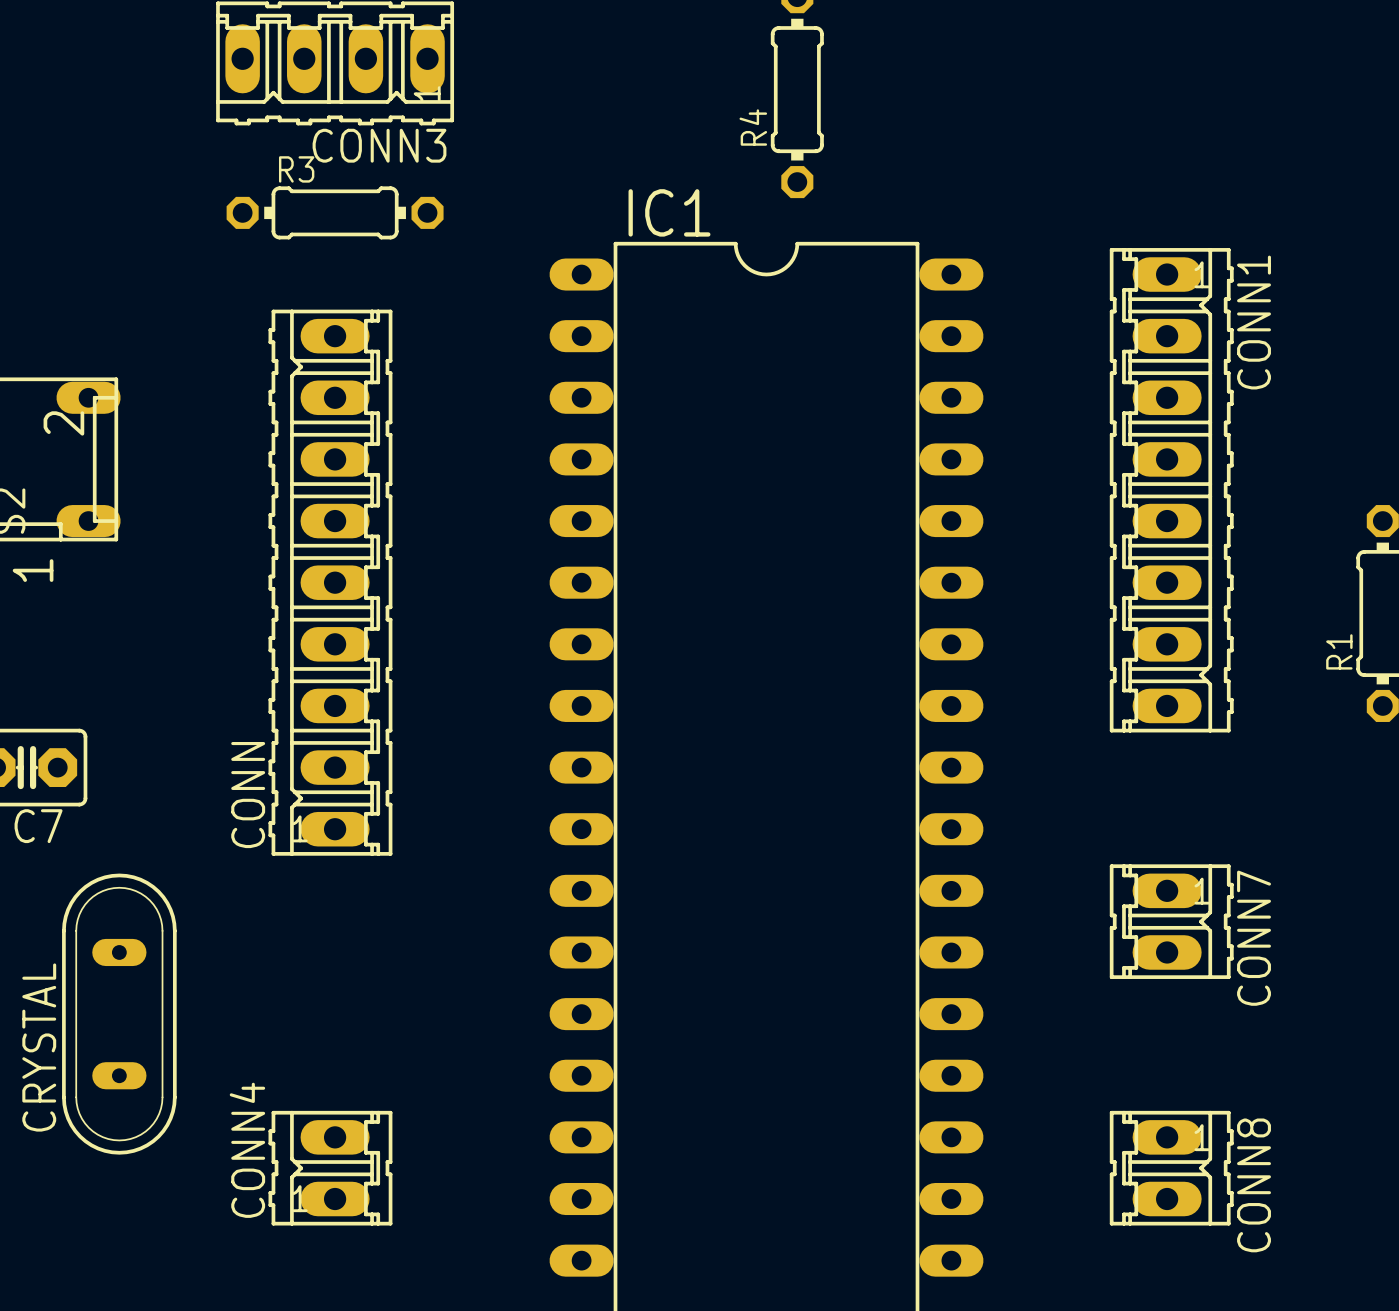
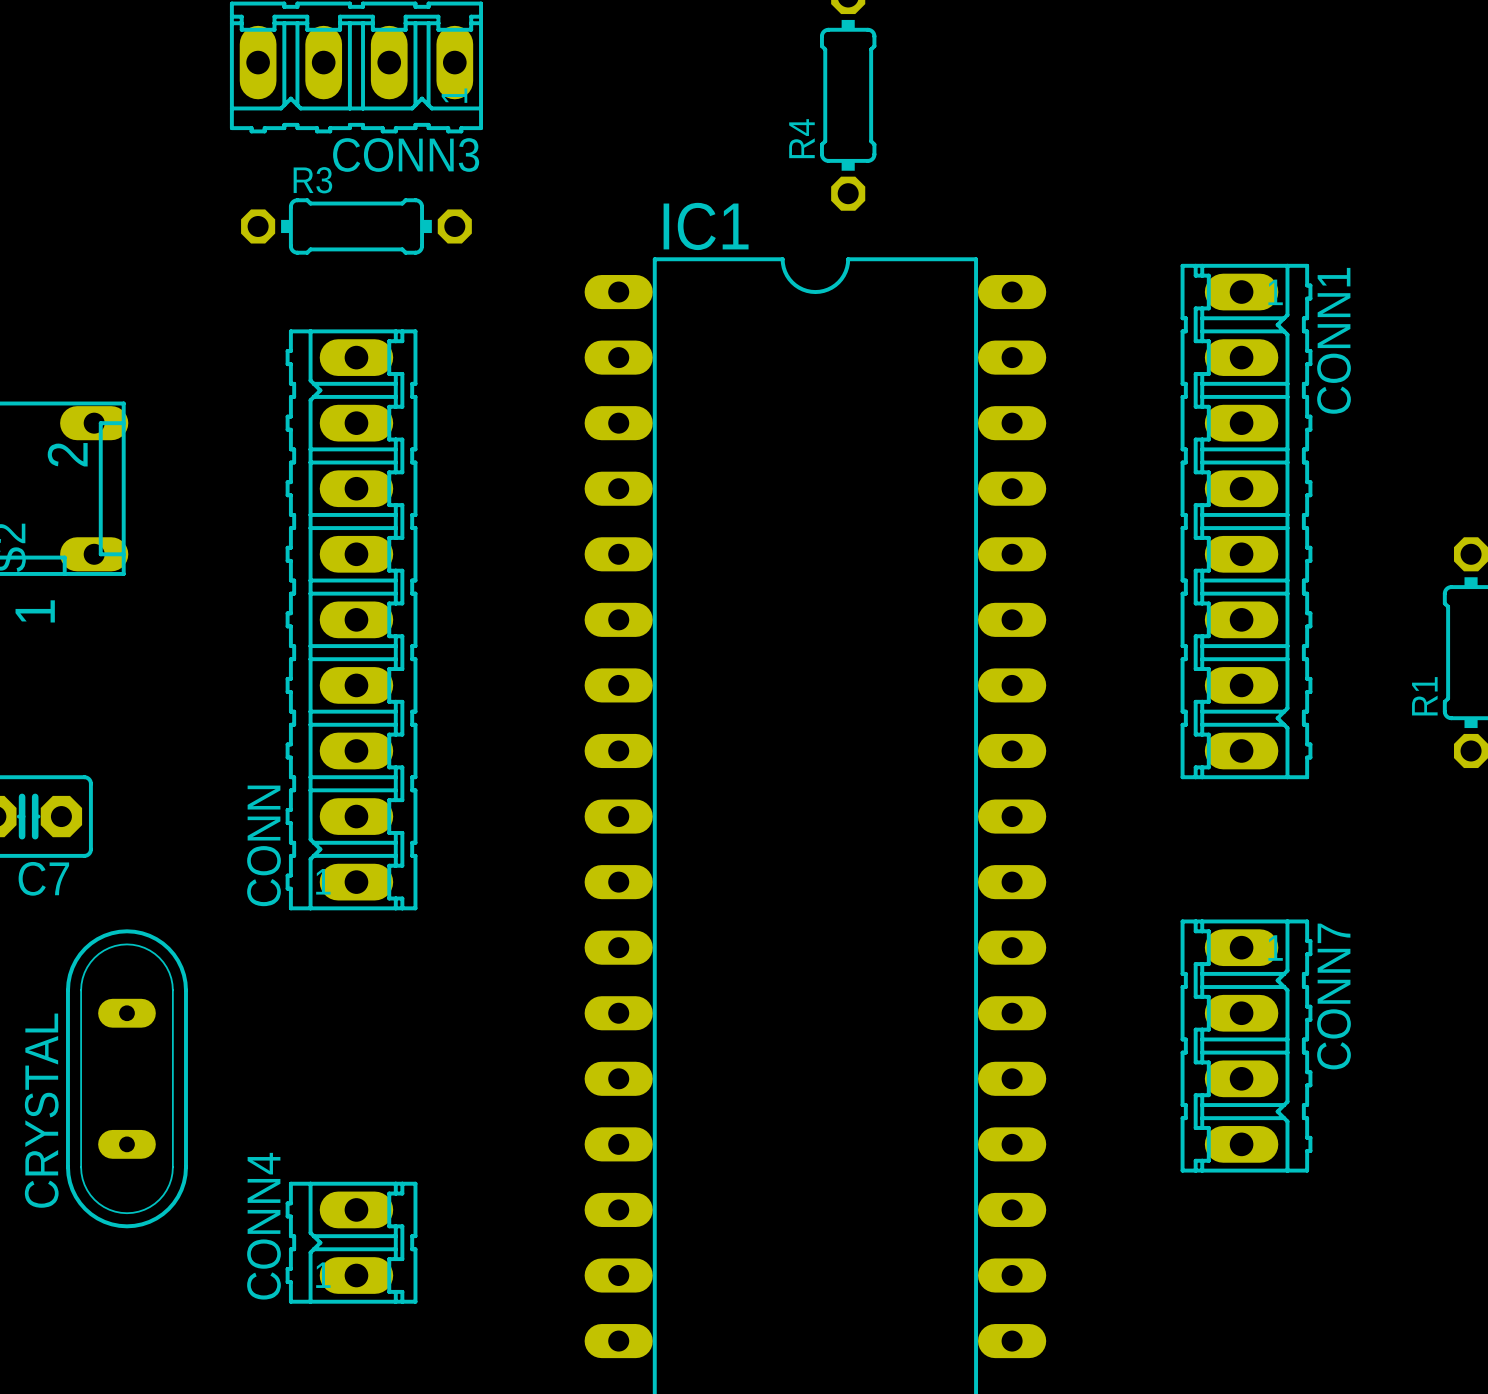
CONN7 footprint: [1109, 864, 1234, 979] -> [1180, 919, 1313, 1173]
CONN8: (1171, 1168) -> none

